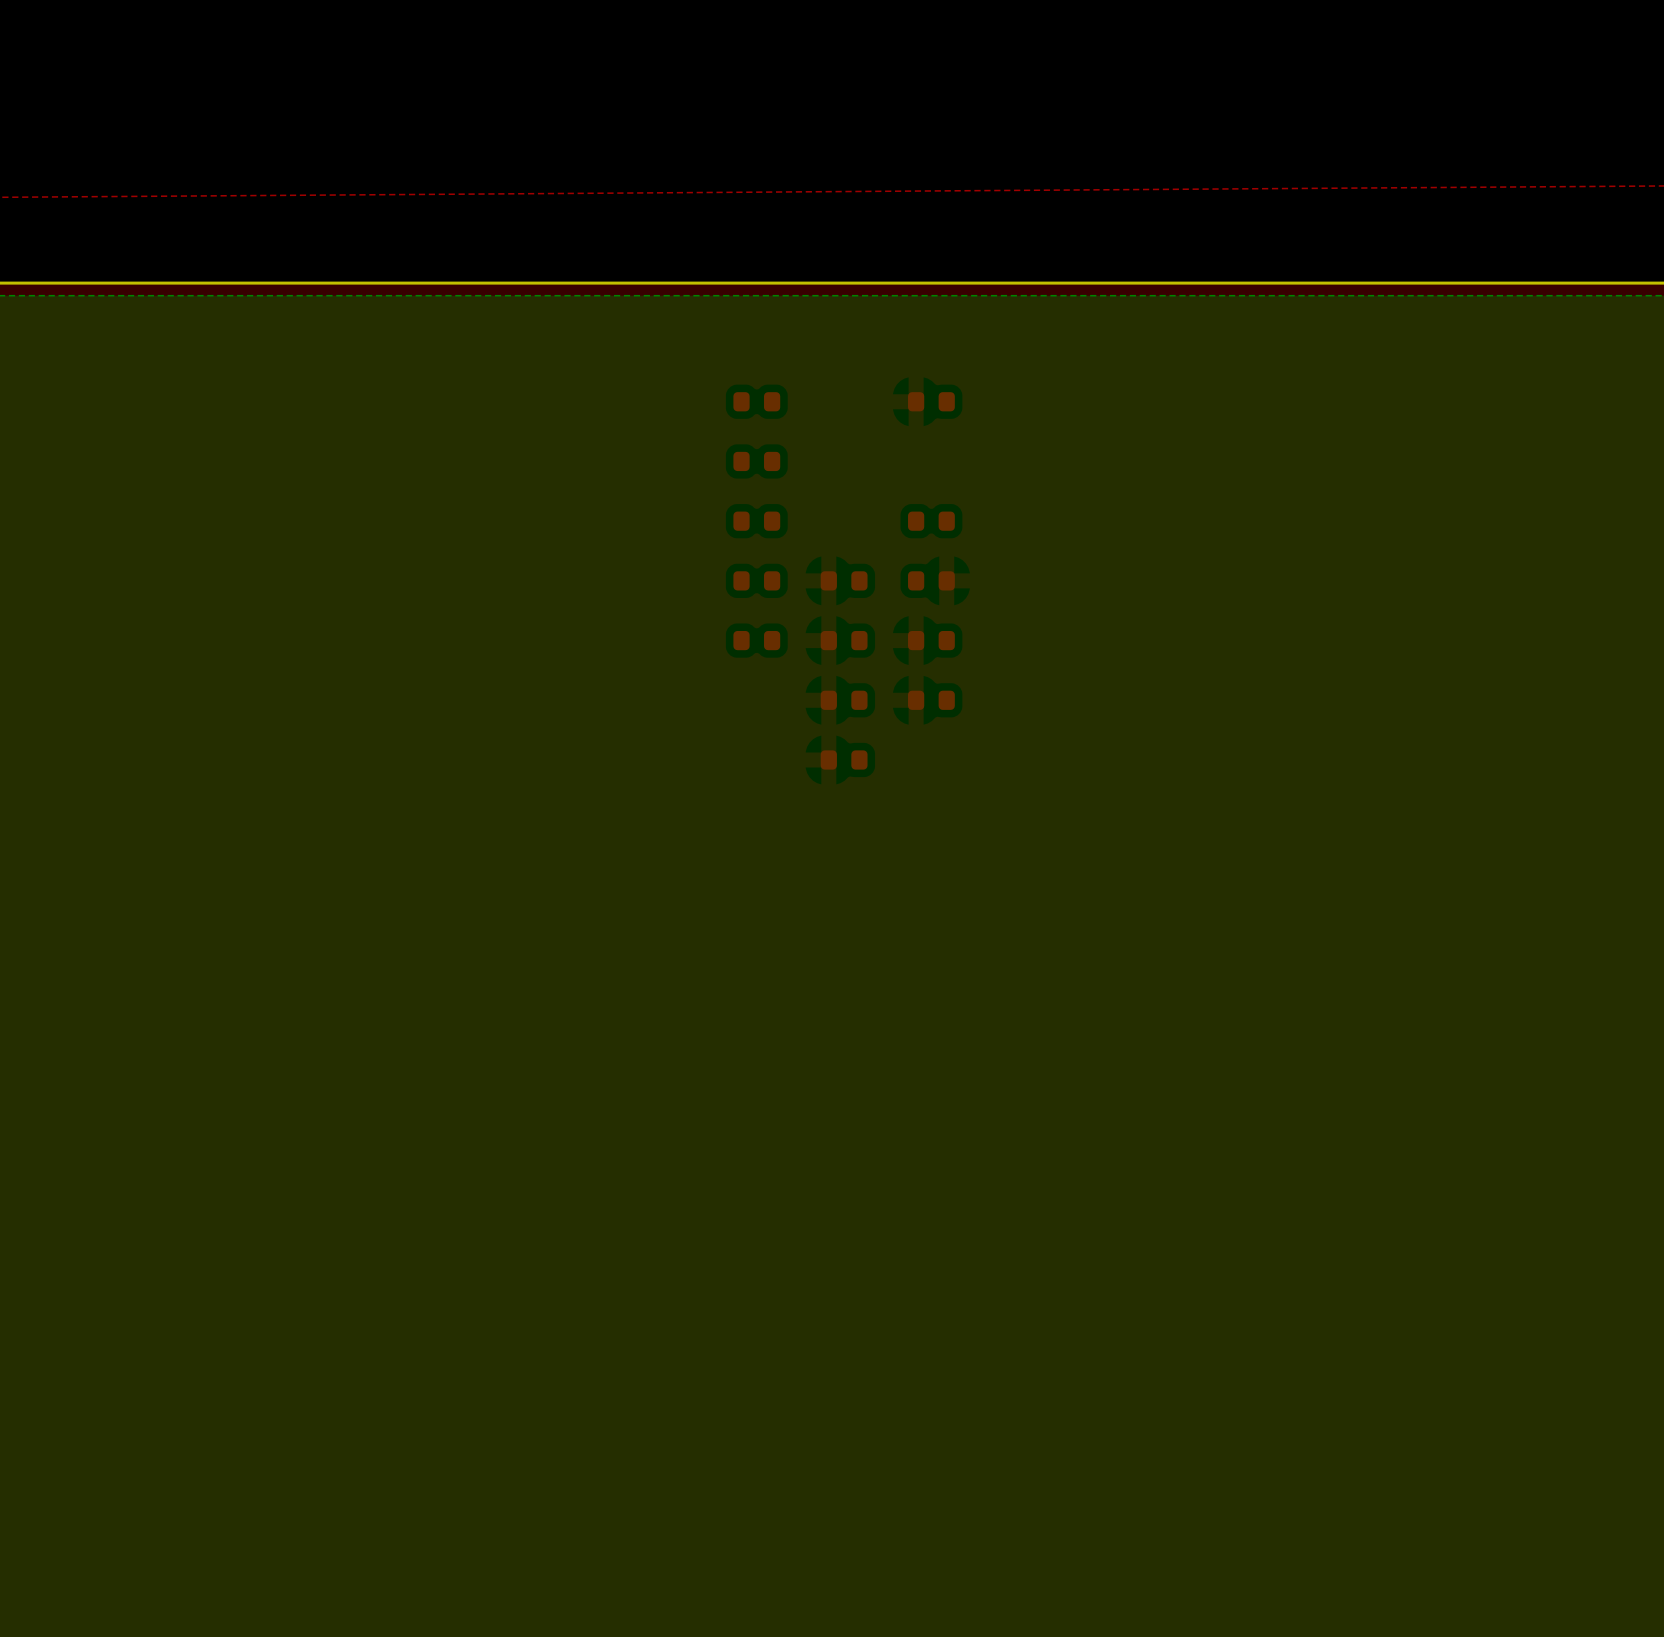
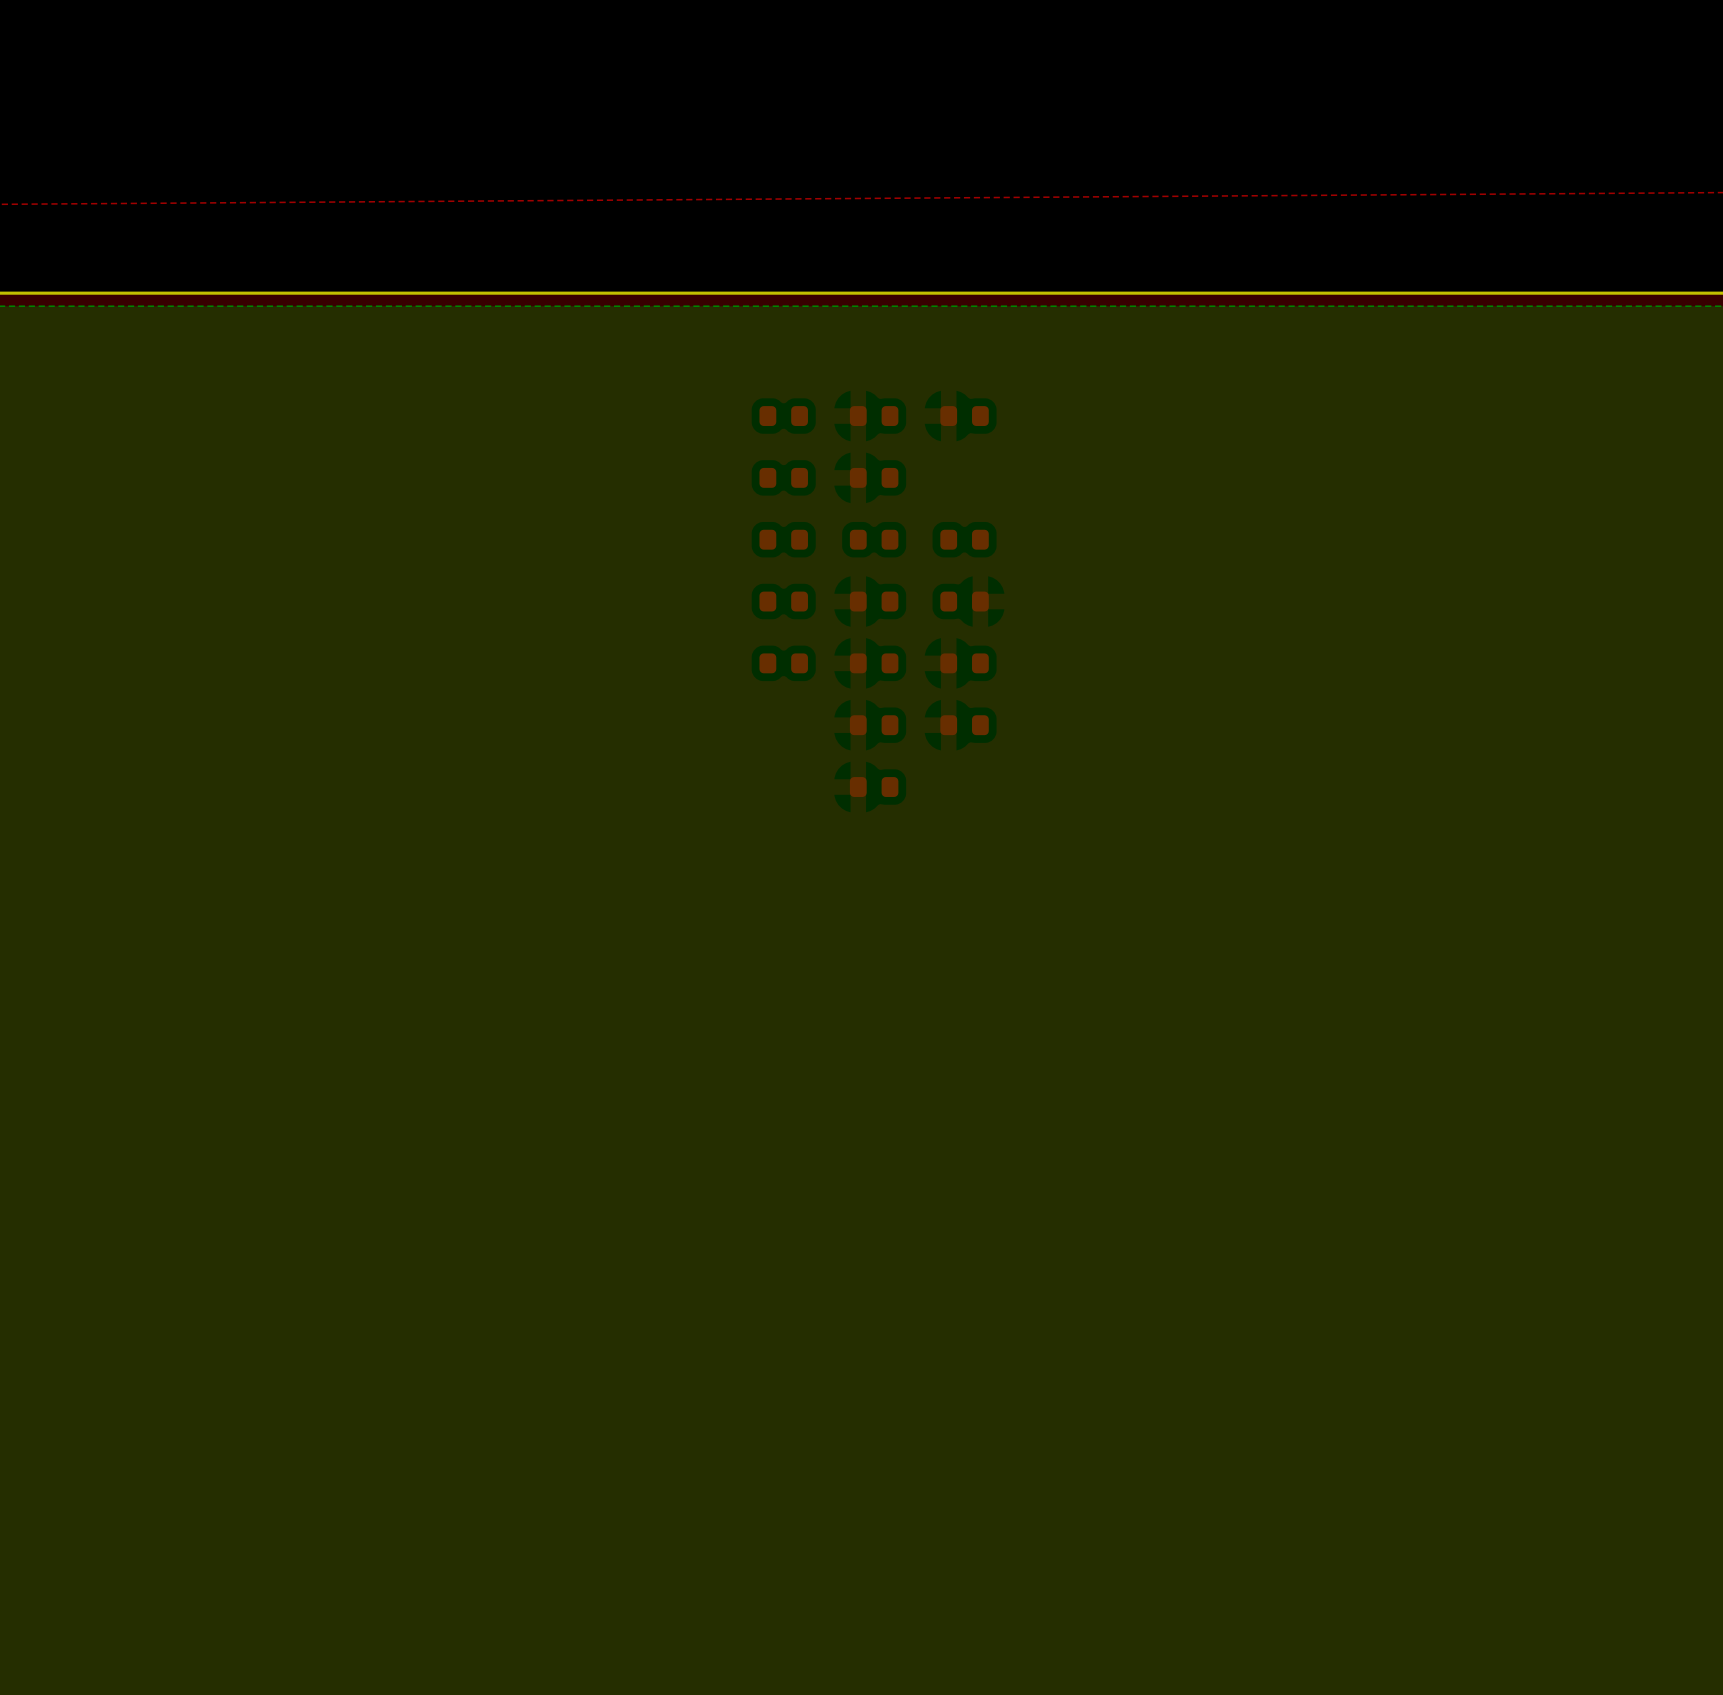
part: none -> (874, 416)
part: none -> (874, 477)
part: none -> (874, 539)

